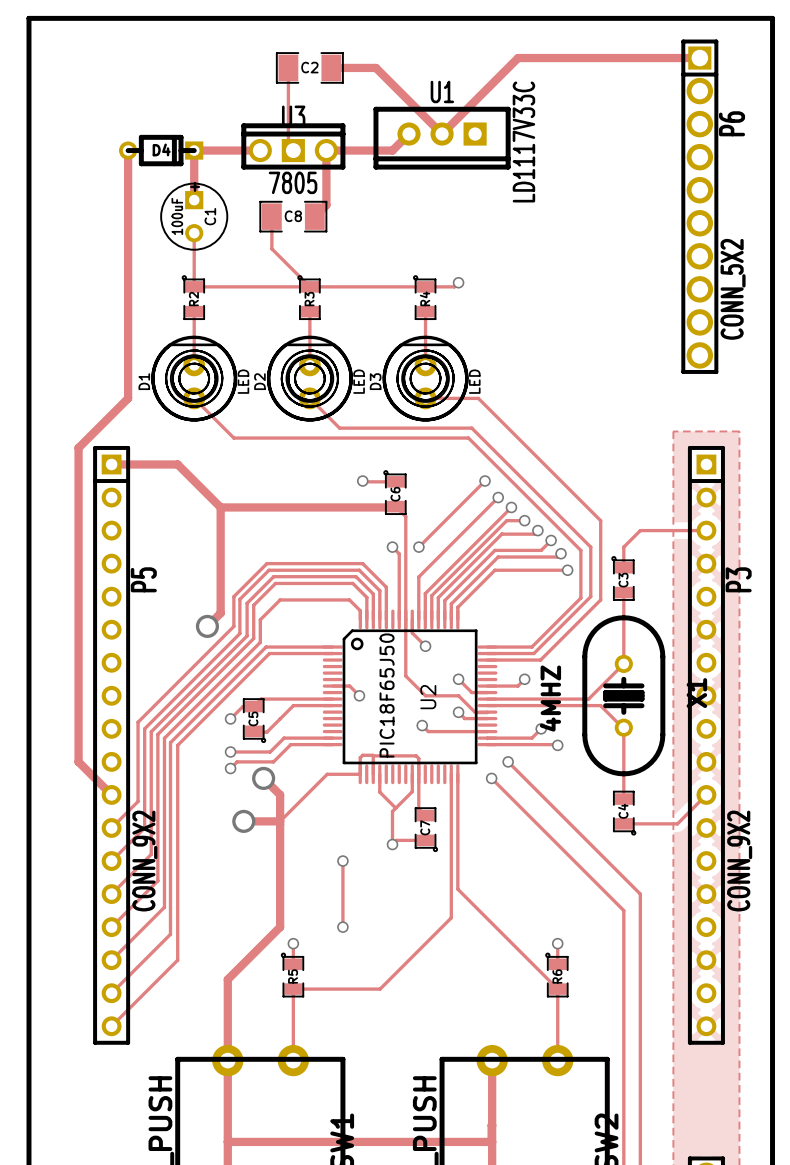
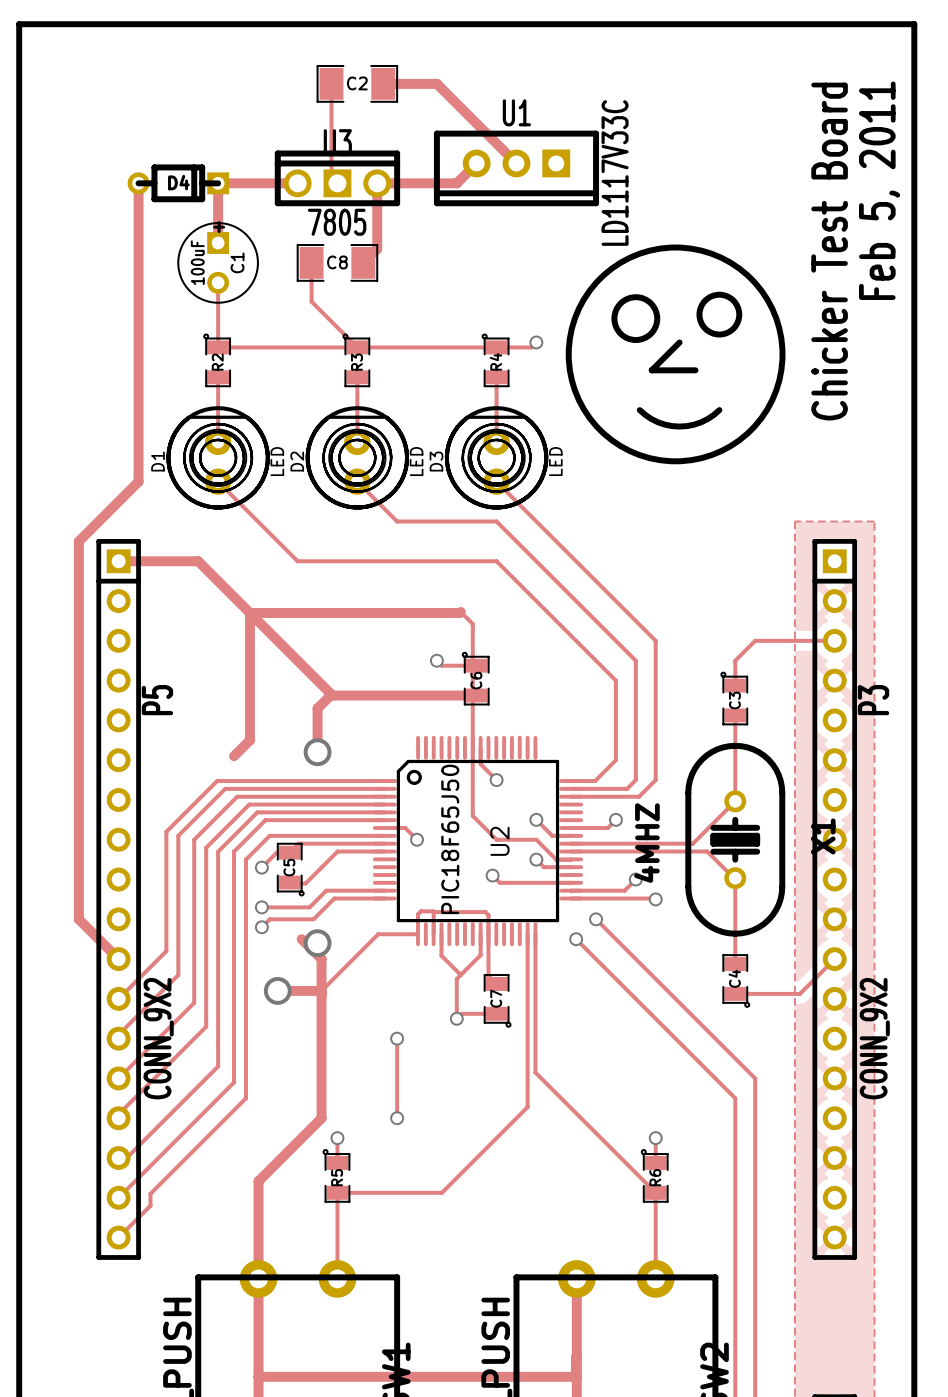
track: (699, 58) (518, 58) (442, 134) -> none
text: none -> Feb 5, 2011 (879, 190)
drawing: none -> [565, 244, 786, 465]
P6: CONN_5X2 (699, 206) -> none
text: none -> Chicker Test Board (829, 251)
line: none -> (679, 342) (651, 370) (695, 370)
line: none -> (639, 410) (658, 422) (679, 426) (701, 422) (719, 410)
track: (425, 398) (478, 398) (600, 520) (600, 599) (540, 660) -> (496, 481) (655, 640) (655, 780) (639, 796) (635, 796)
track: (339, 428) (471, 428) (590, 547) (590, 596) (541, 646) -> (393, 517) (397, 521) (496, 521) (635, 660) (635, 780)
track: (233, 438) (468, 438) (580, 550) (580, 598) (531, 647) (507, 647) -> (265, 529) (297, 561) (496, 561) (615, 680) (615, 760) (595, 781)
track: (362, 481) (395, 481) -> none
via: (362, 481) -> none
track: (485, 481) (418, 547) -> none
via: (485, 481) -> none
C6 position: (394, 492) -> (475, 678)
track: (498, 497) (418, 576) (418, 619) -> none
via: (498, 497) -> none
track: none -> (249, 612) (332, 695)
track: (511, 507) (425, 593) (425, 619) -> none
via: (511, 507) -> none
track: (524, 520) (506, 520) (431, 595) (431, 619) -> none
via: (524, 520) -> none
track: (537, 530) (534, 534) (501, 534) -> none
via: (537, 530) -> none
track: (502, 533) (438, 597) (438, 619) -> none
track: (551, 540) (541, 550) (494, 550) (444, 600) (444, 619) -> none
via: (551, 540) -> none
track: none -> (436, 660) (441, 665) (476, 665)
track: (392, 547) (399, 553) (399, 619) -> none
via position: (392, 547) -> (436, 660)
via: (418, 547) -> none
track: (561, 553) (557, 557) (498, 557) (451, 603) (451, 619) -> none
via: (561, 553) -> none
track: (567, 570) (494, 570) (457, 607) (457, 619) -> none
via: (567, 570) -> none
track: none -> (331, 694) (317, 708) (317, 752)
track: none -> (332, 695) (476, 695) (332, 695)
track: (360, 619) (360, 610) (349, 599) (280, 599) (260, 619) (260, 642) (164, 738) (164, 907) (111, 960) -> (384, 812) (257, 812) (218, 851) (218, 1066) (126, 1158) (118, 1158)
track: (366, 619) (366, 597) (352, 583) (275, 583) (253, 605) (253, 638) (157, 734) (157, 880) (111, 927) -> (384, 804) (249, 804) (206, 847) (206, 1026) (118, 1114) (118, 1118)
track: (373, 619) (373, 594) (355, 576) (273, 576) (247, 603) (247, 636) (151, 731) -> (304, 781) (217, 781) (166, 831) (166, 883)
track: (379, 619) (379, 590) (359, 570) (269, 570) (239, 599) (239, 633) (144, 728) (144, 827) (111, 861) -> (308, 788) (225, 788) (178, 835) (178, 975) (118, 1034) (118, 1038)
track: (386, 619) (386, 587) (362, 563) (266, 563) (233, 596) (233, 626) (138, 722) (138, 801) -> none
via position: (207, 626) -> (317, 752)
track: (266, 647) (233, 679) -> (384, 820) (265, 820)
track: (269, 653) (177, 745) (177, 960) (138, 999) -> (384, 835) (269, 835) (245, 859) (245, 1098) (150, 1193) (150, 1205)
track: none -> (384, 796) (237, 796) (194, 839) (194, 1002) (166, 1030)
track: (207, 705) (170, 742) (170, 934) -> (234, 851) (234, 1082) (189, 1126)
via position: (263, 778) -> (317, 943)
track: (151, 788) (151, 854) -> (166, 951) (150, 967)

